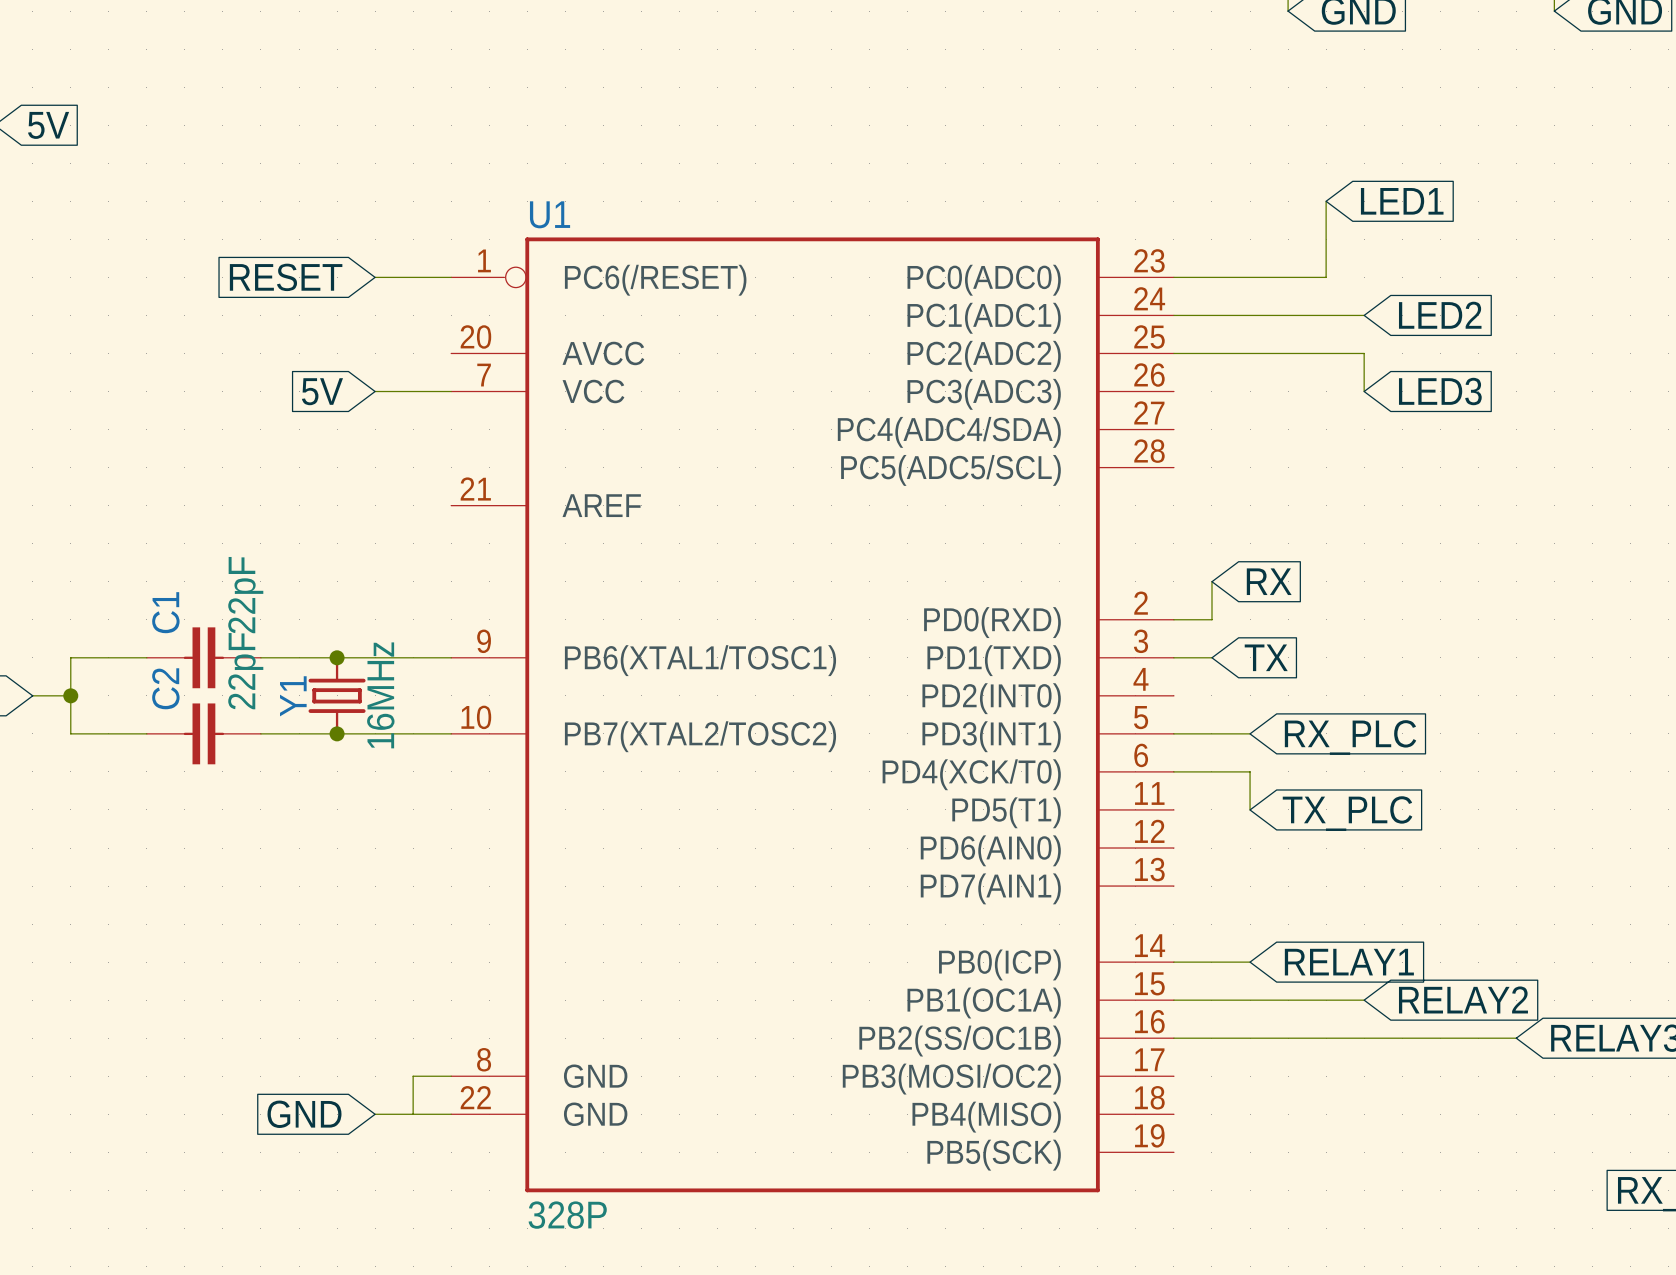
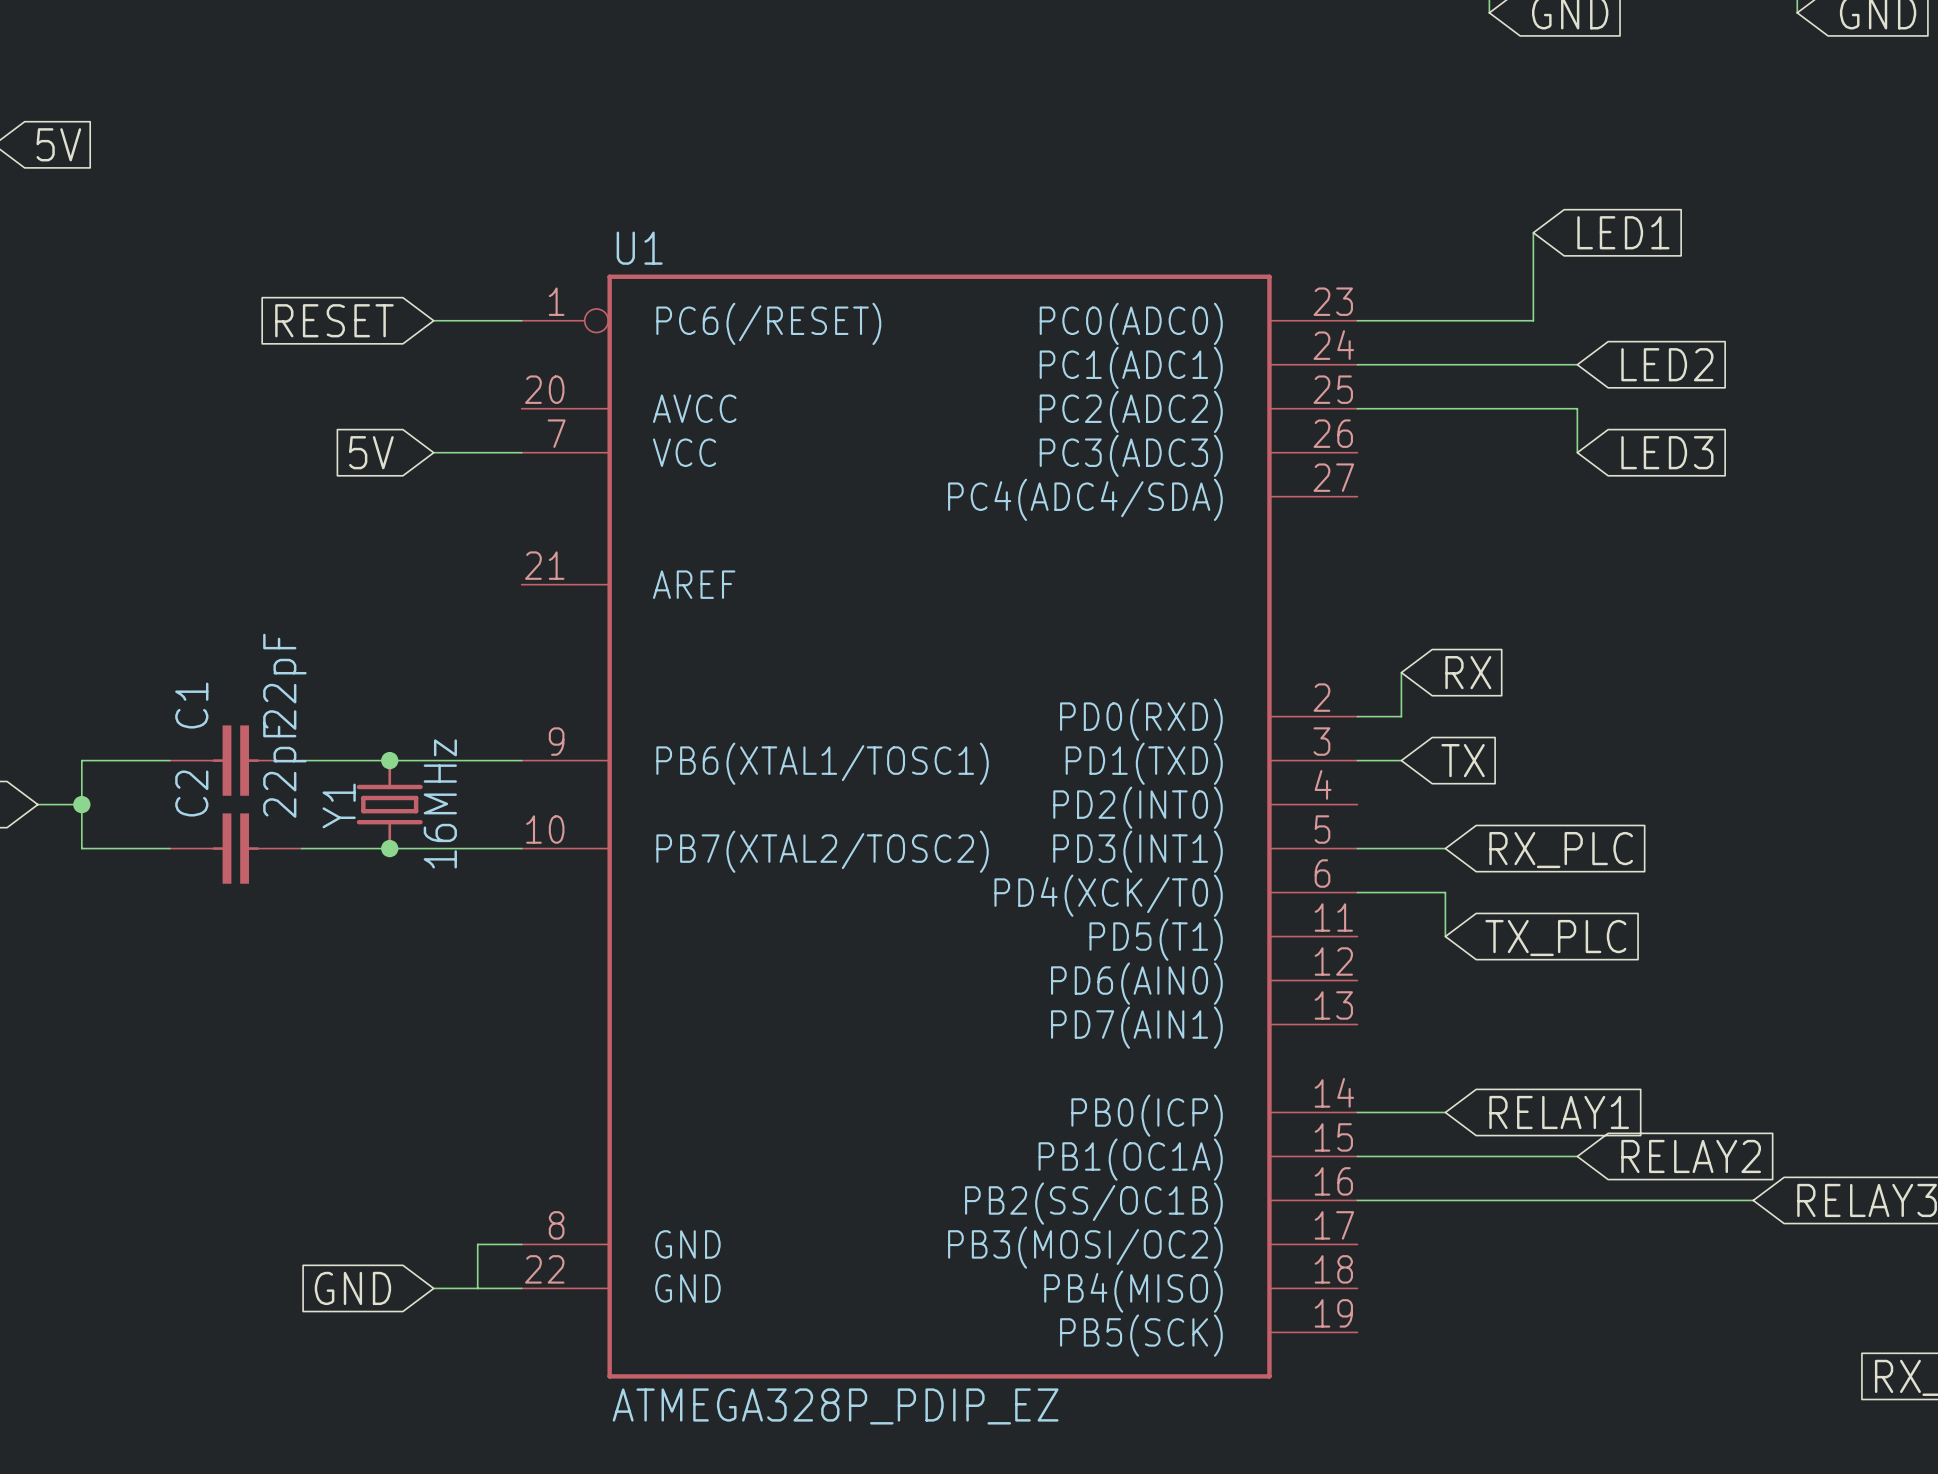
U1 symbol: [451, 237, 1174, 1193] -> [521, 274, 1358, 1379]
U1 value: 328P (567, 1215) -> ATMEGA328P_PDIP_EZ (835, 1406)

